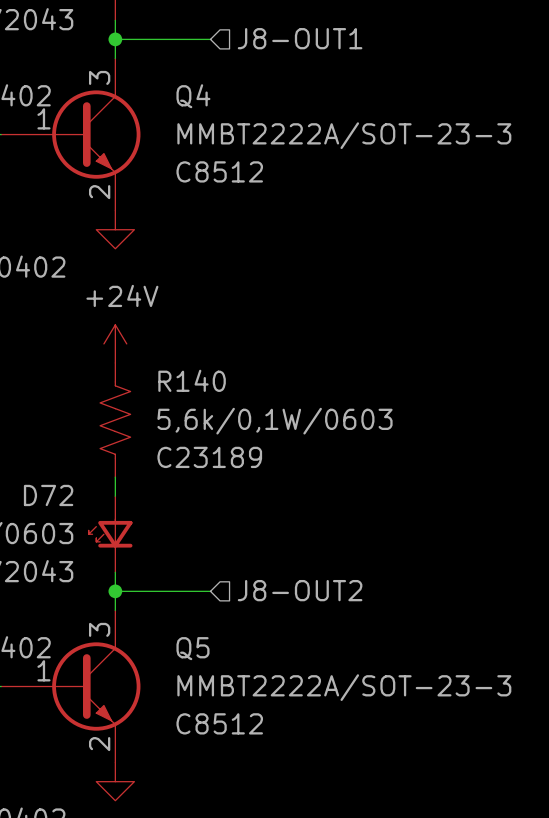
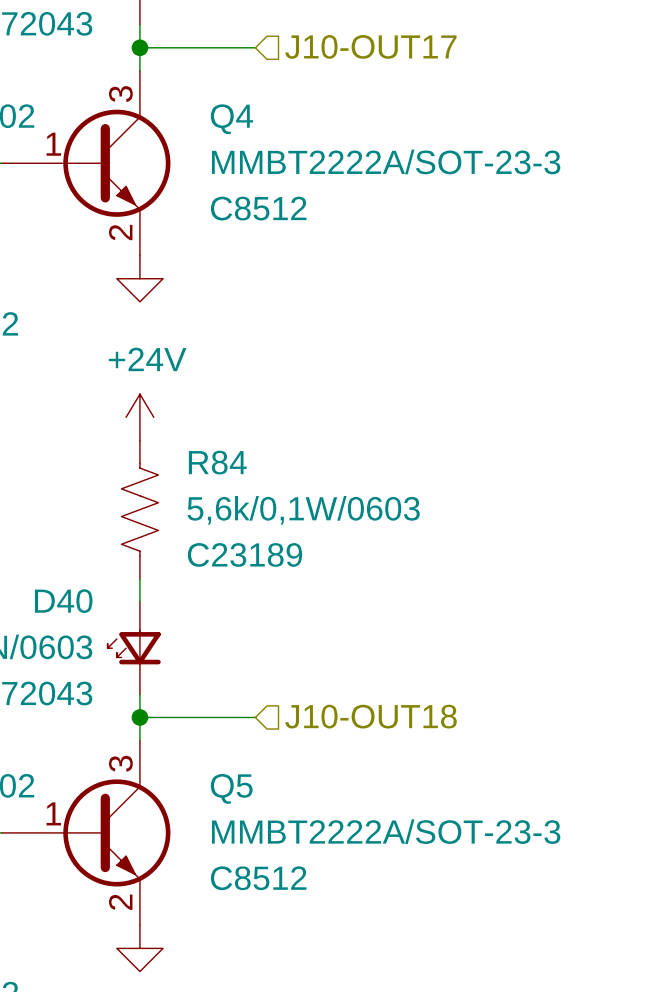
hierarchical label: J8-OUT1 (300, 38) -> J10-OUT17 (370, 46)
R140 name: R140 (192, 380) -> R84 (217, 462)
D72 name: D72 (48, 495) -> D40 (63, 601)
hierarchical label: J8-OUT2 (300, 590) -> J10-OUT18 (371, 716)

